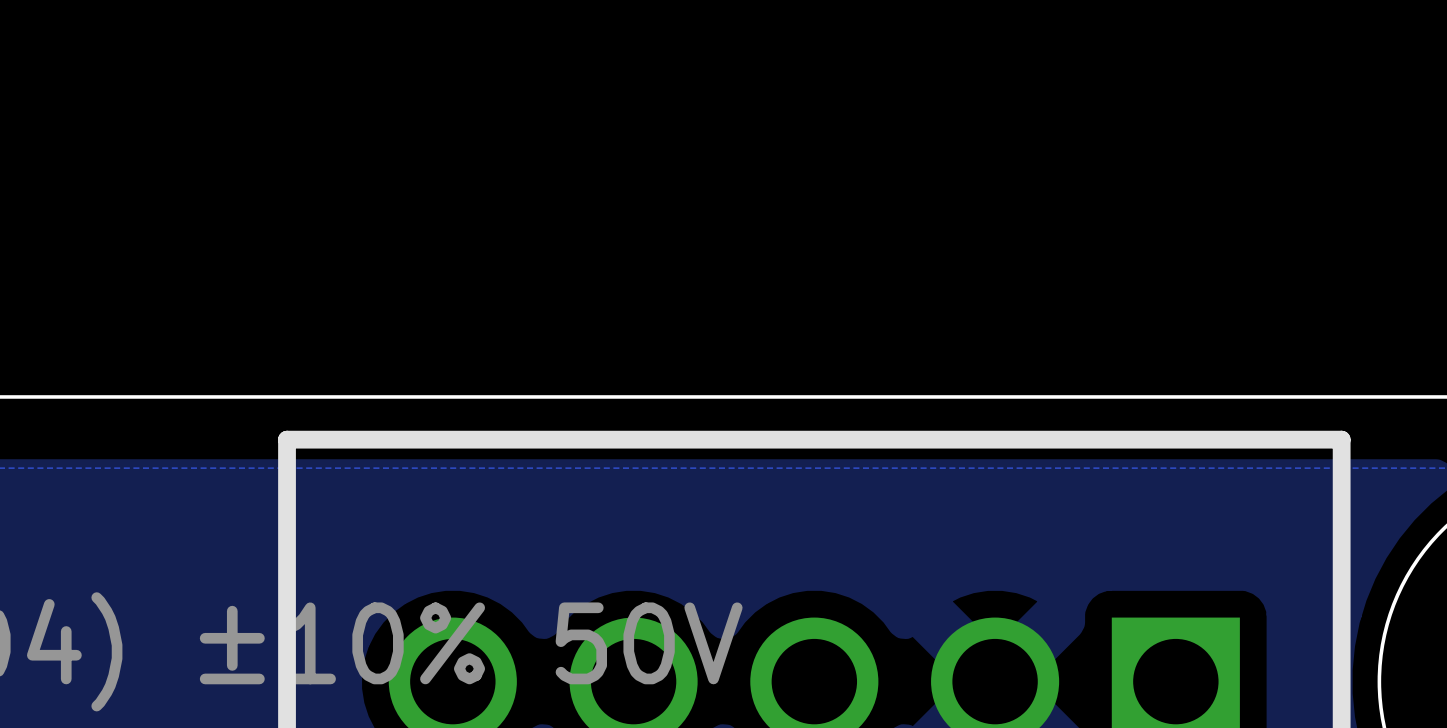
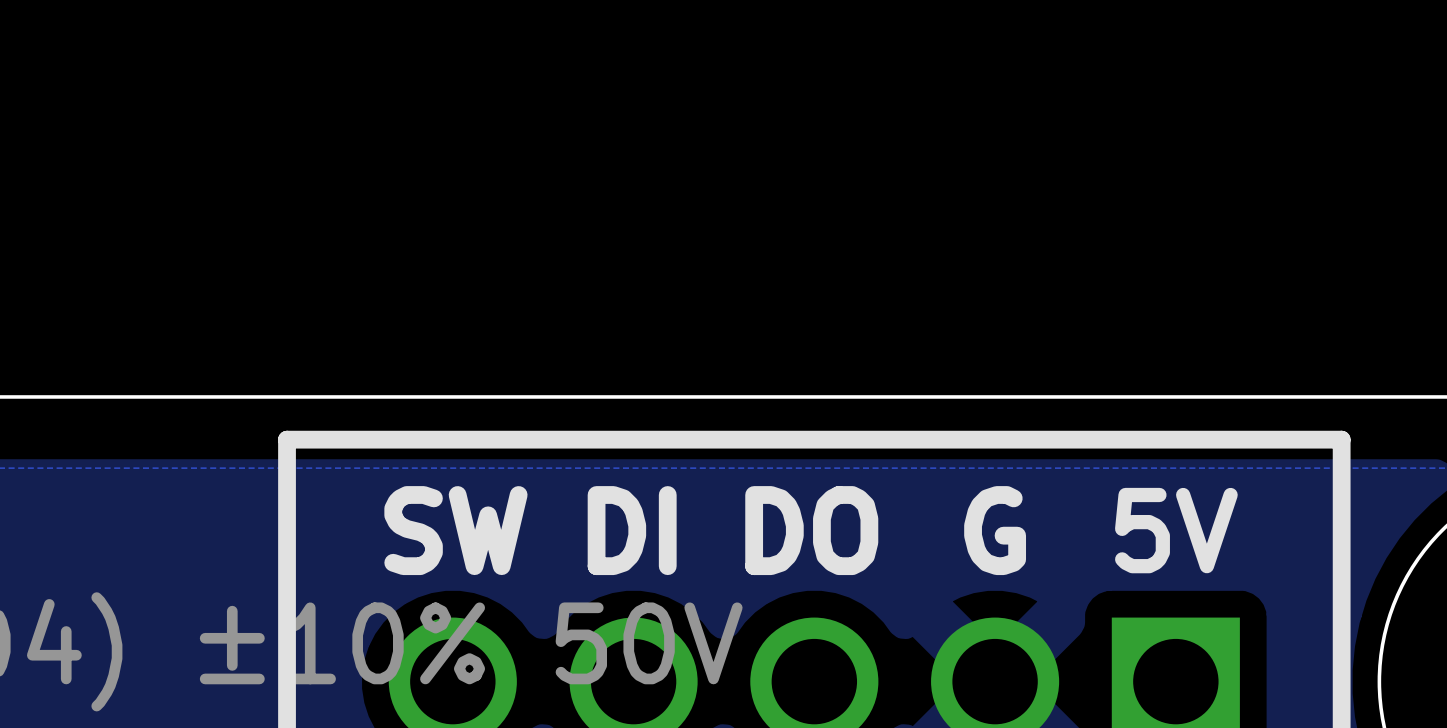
text: none -> SW (455, 530)
text: none -> DI (632, 530)
text: none -> DO (811, 530)
text: none -> G (995, 530)
text: none -> 5V (1176, 530)

